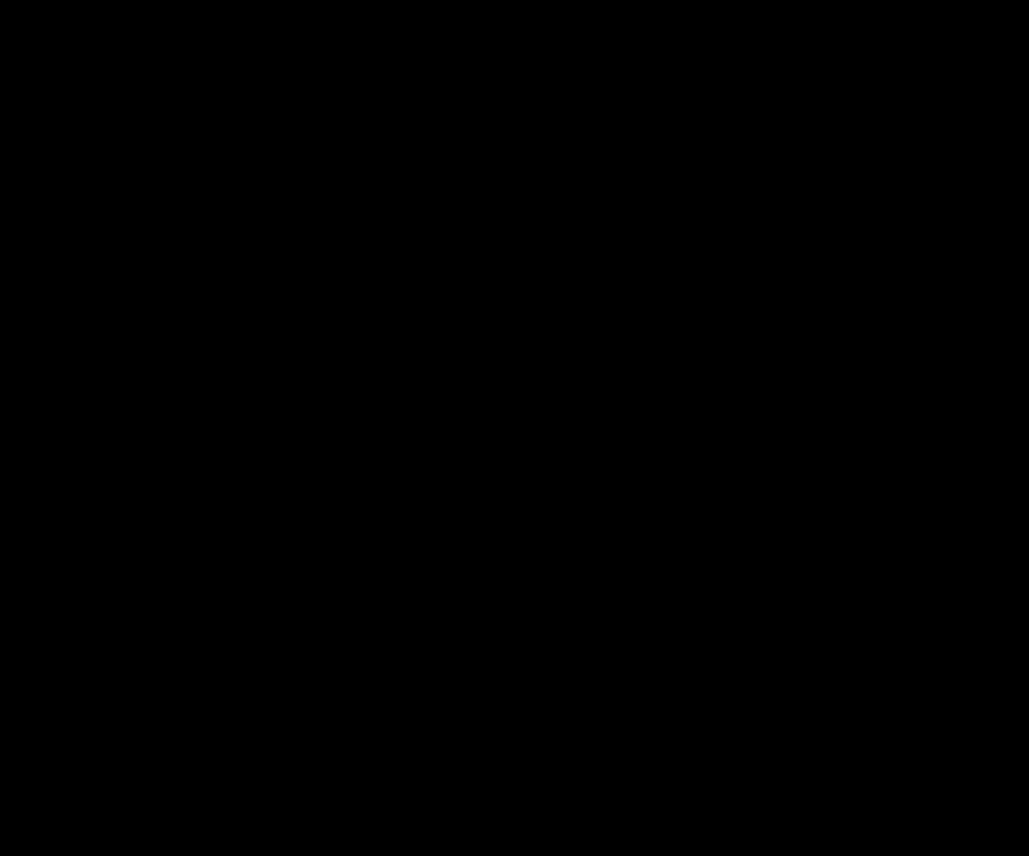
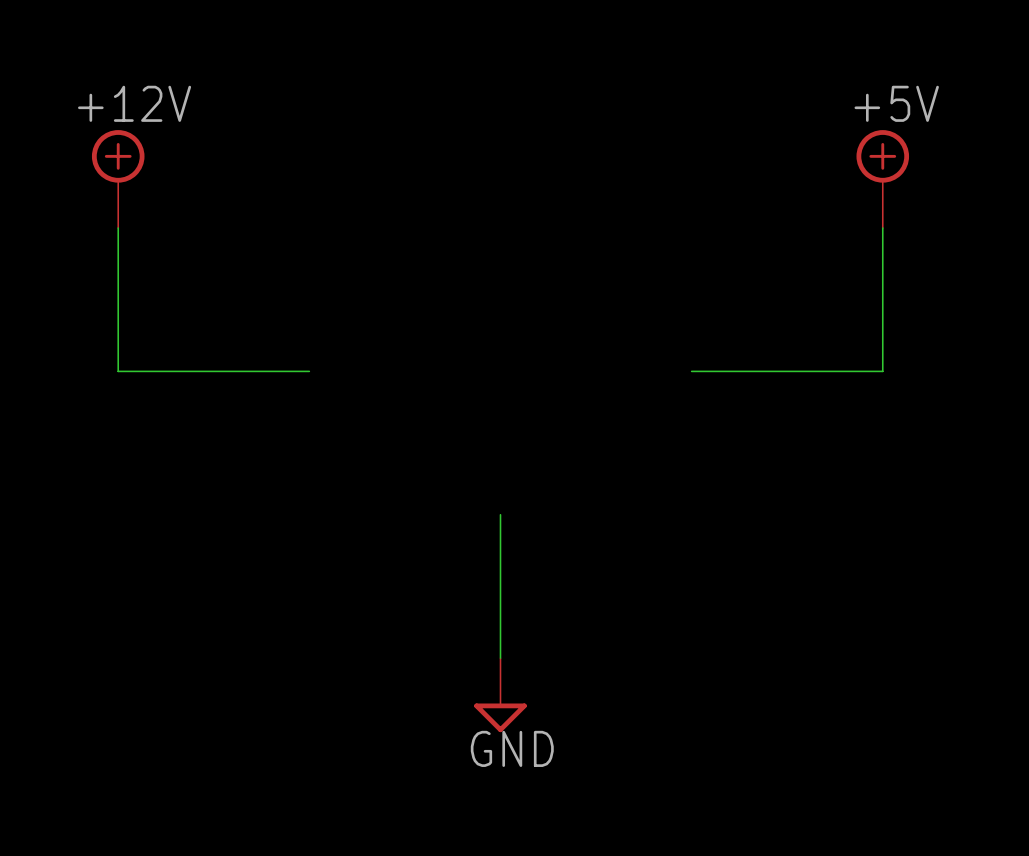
power symbol: none -> +12V (118, 179)
power symbol: none -> +5V (882, 179)
wire: none -> (118, 228) (118, 371) (309, 371)
wire: none -> (882, 228) (882, 371) (691, 371)
wire: none -> (500, 514) (500, 658)
power symbol: none -> GND (500, 695)

